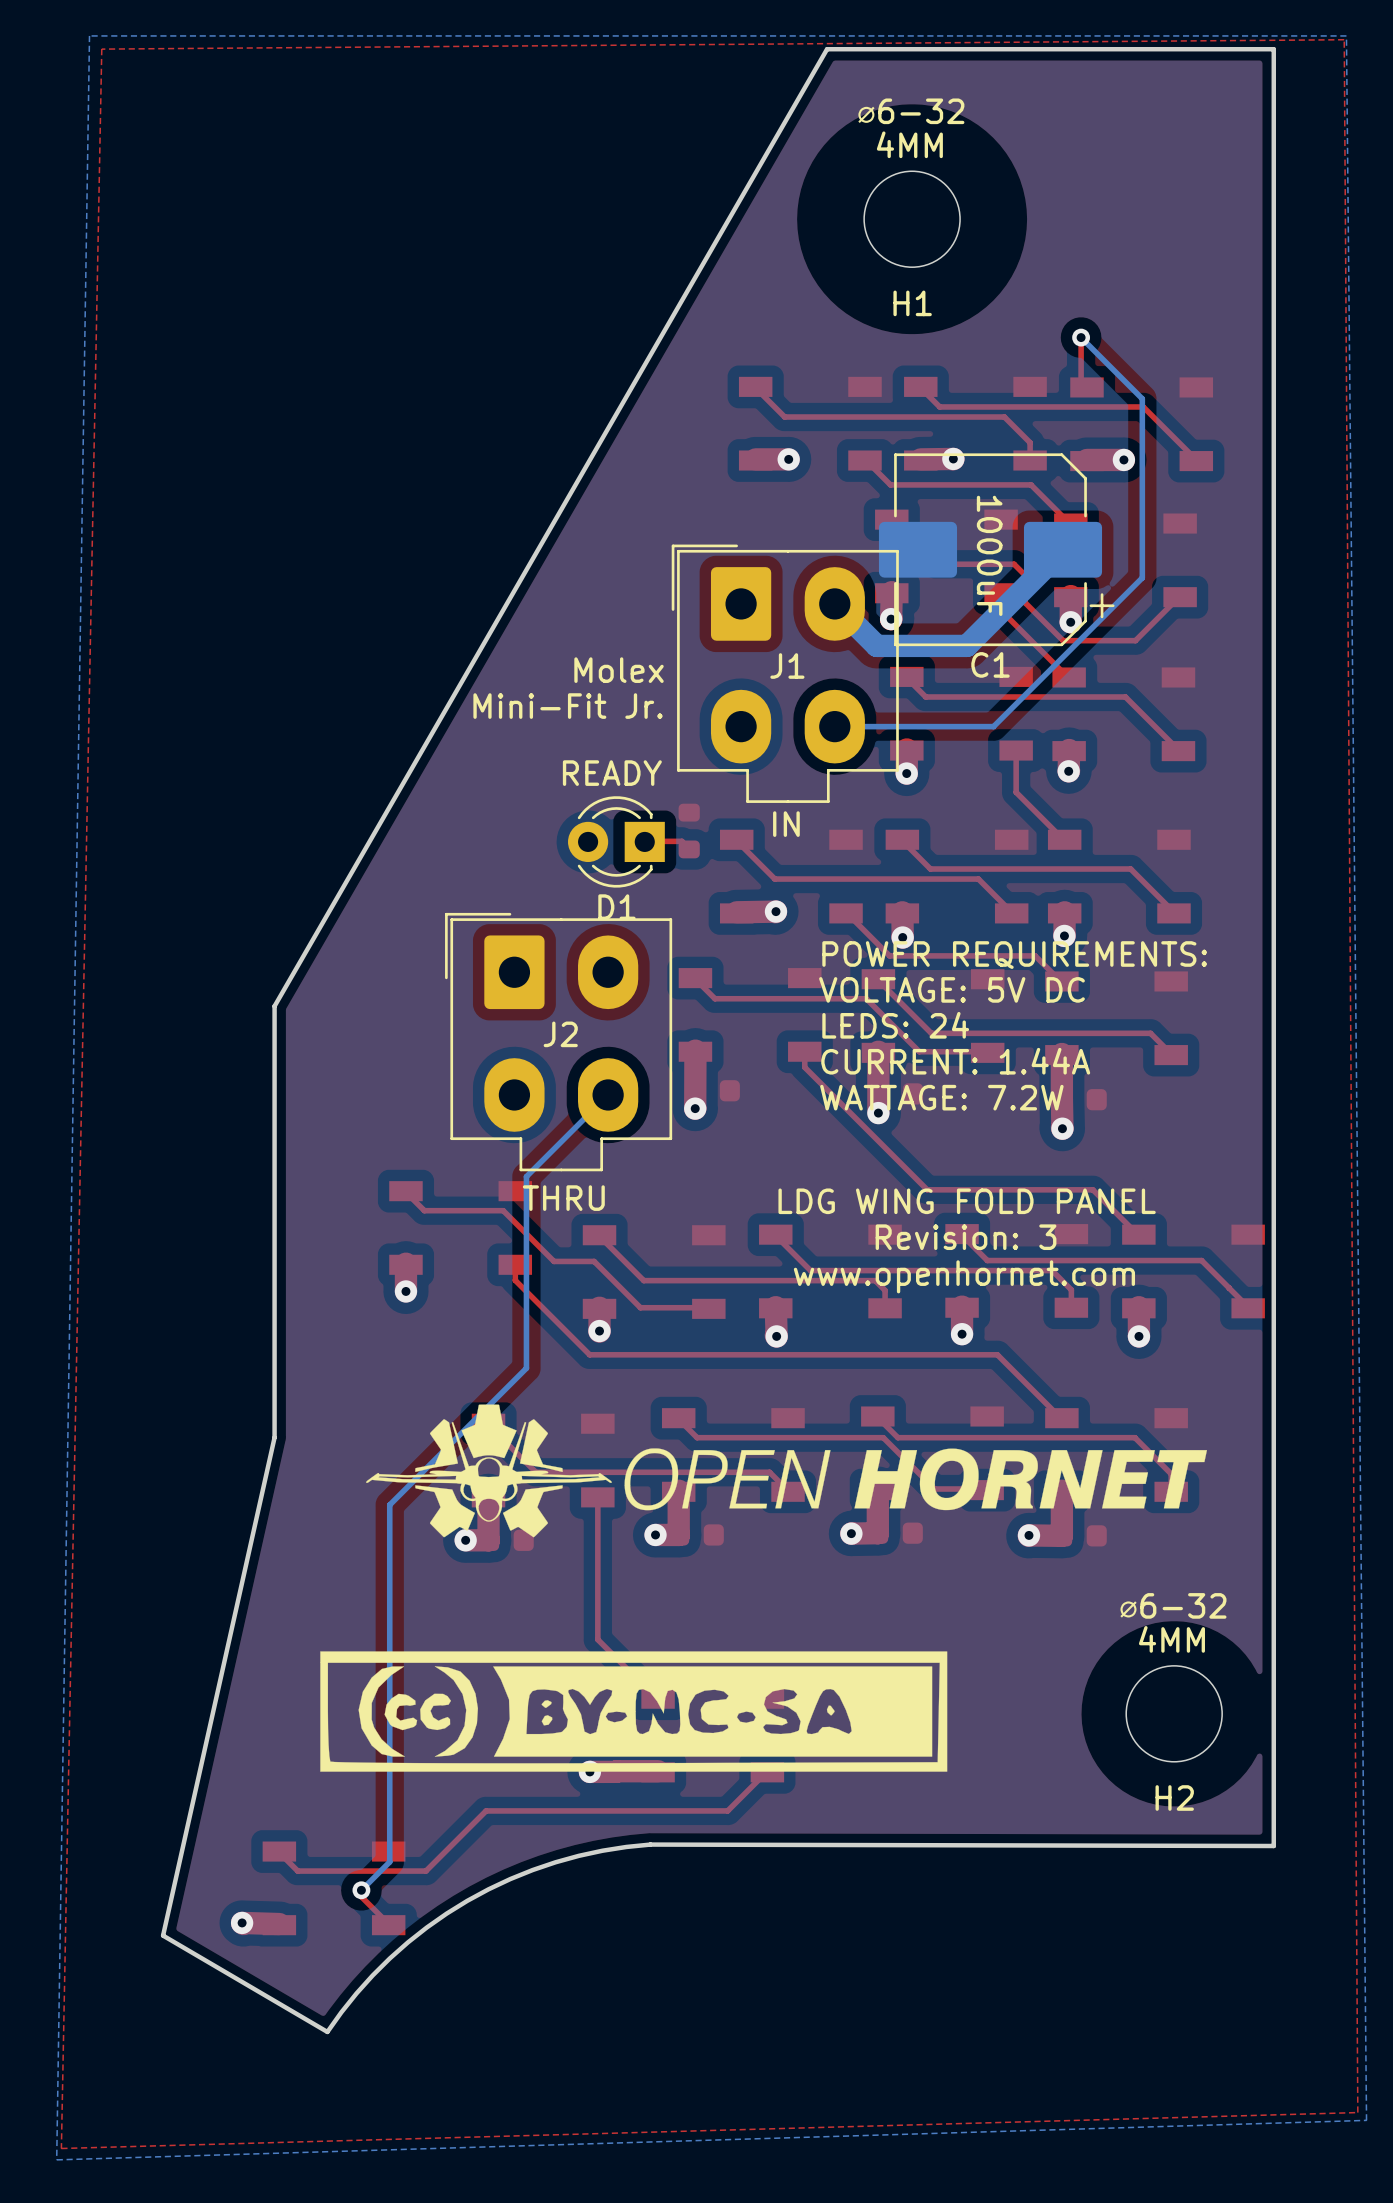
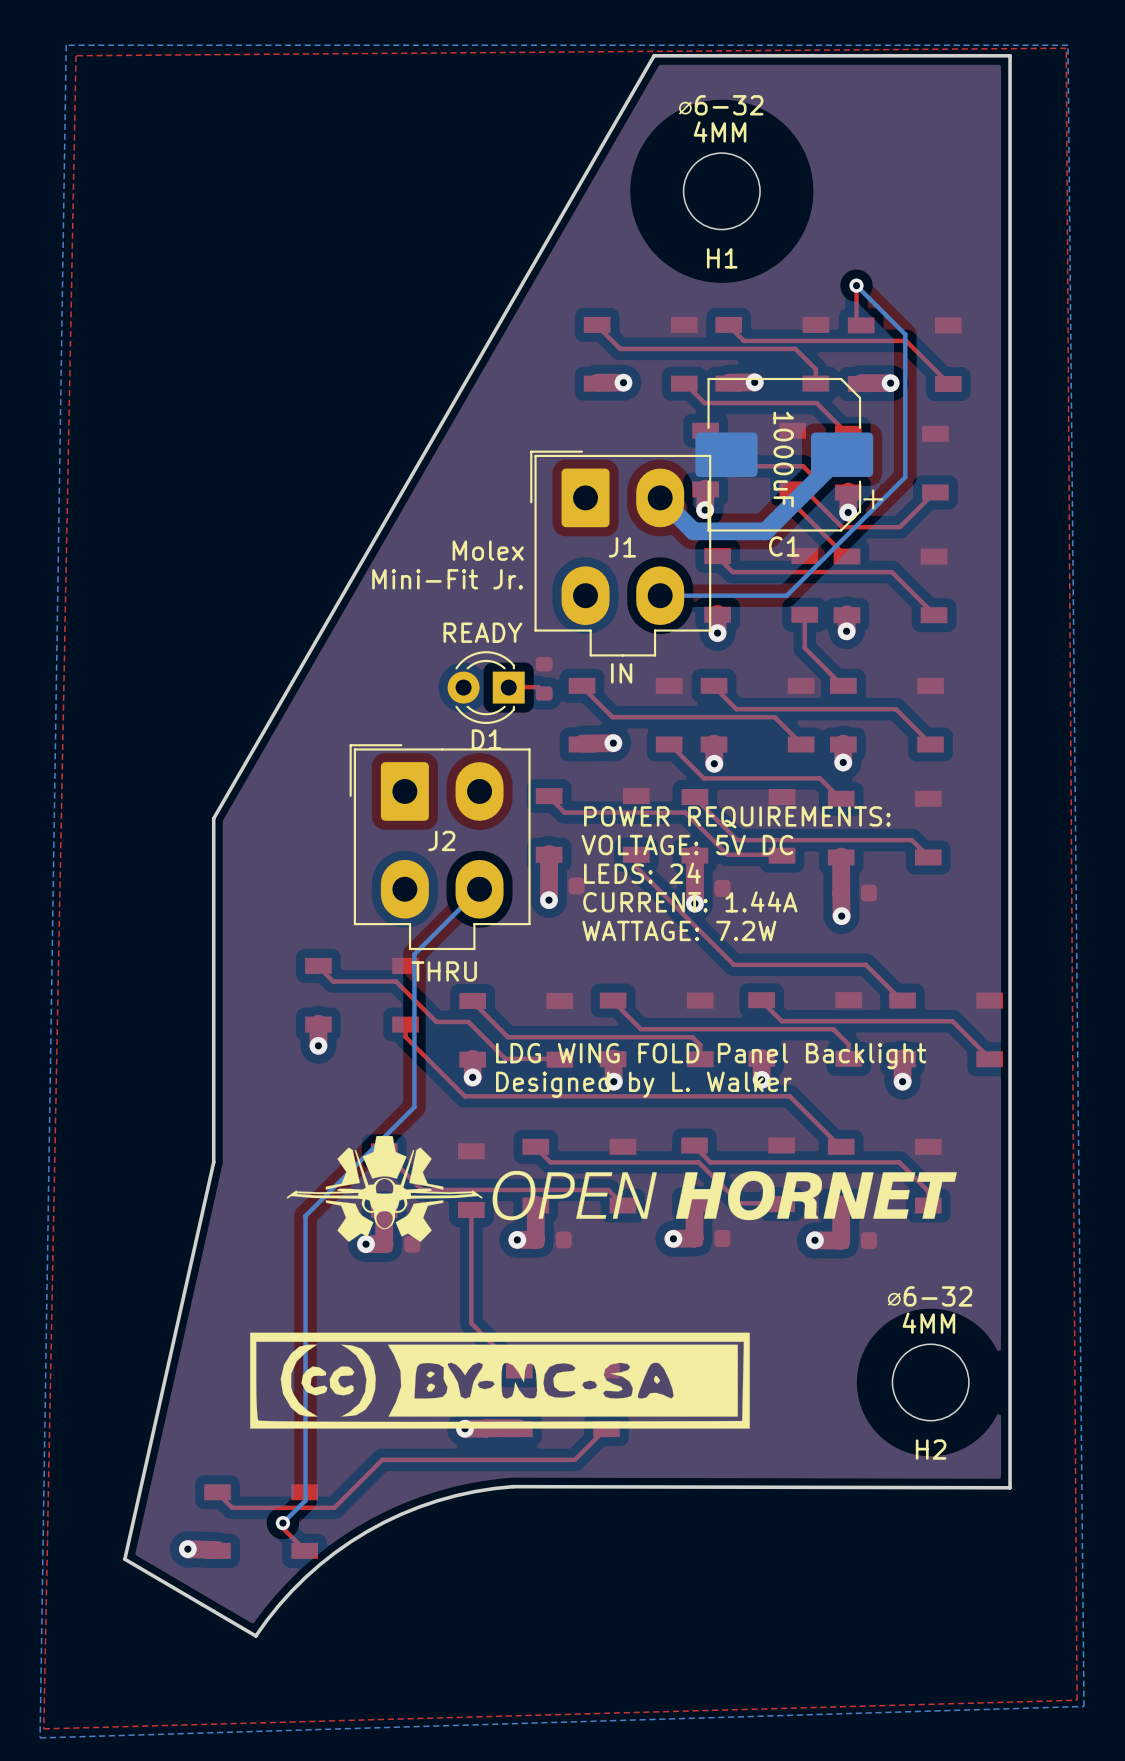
text position: POWER REQUIREMENTS: (1014, 955) -> POWER REQUIREMENTS: (737, 817)
text position: VOLTAGE: 5V DC (951, 989) -> VOLTAGE: 5V DC (687, 845)
text position: LEDS: 24 (895, 1025) -> LEDS: 24 (642, 873)
text position: CURRENT: 1.44A (955, 1061) -> CURRENT: 1.44A (690, 901)
text position: WATTAGE: 7.2W (941, 1097) -> WATTAGE: 7.2W (679, 930)
text: LDG WING FOLD PANEL (967, 1201) -> none
text: Revision: 3 (966, 1237) -> none
text: www.openhornet.com (964, 1276) -> none
text: none -> LDG WING FOLD Panel Backlight (711, 1056)
text: none -> Designed by L. Walker (643, 1084)

